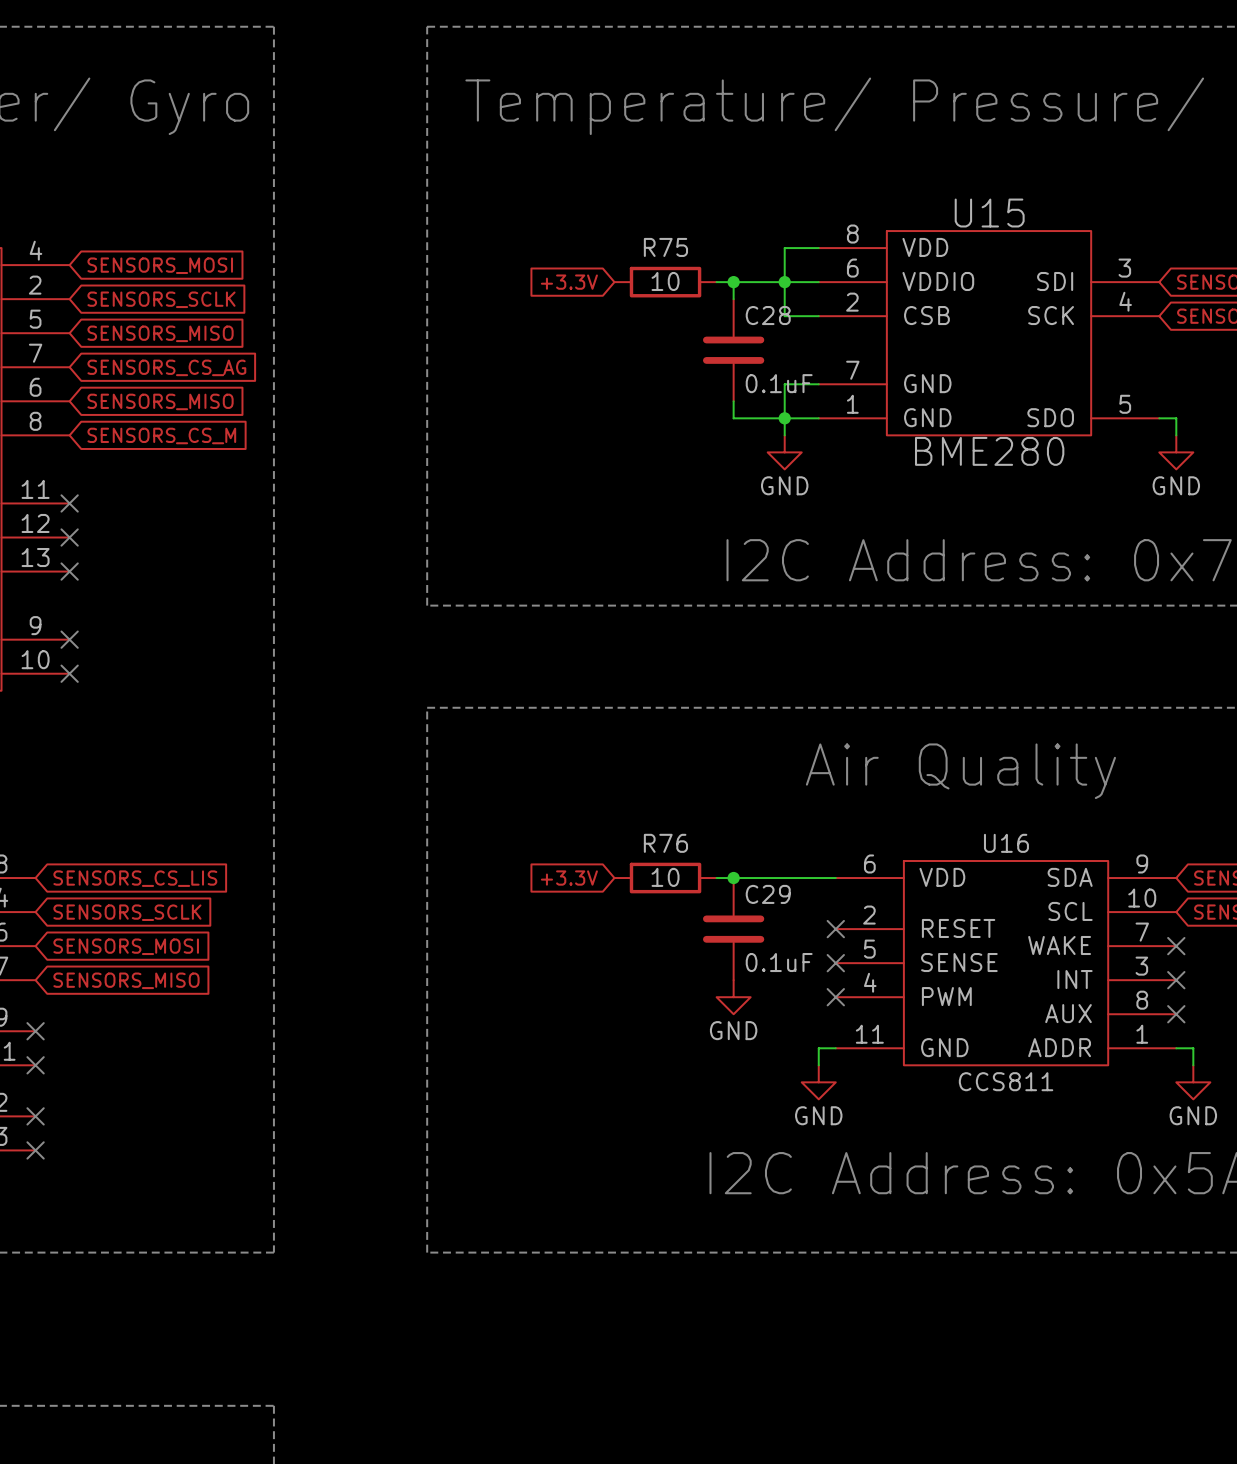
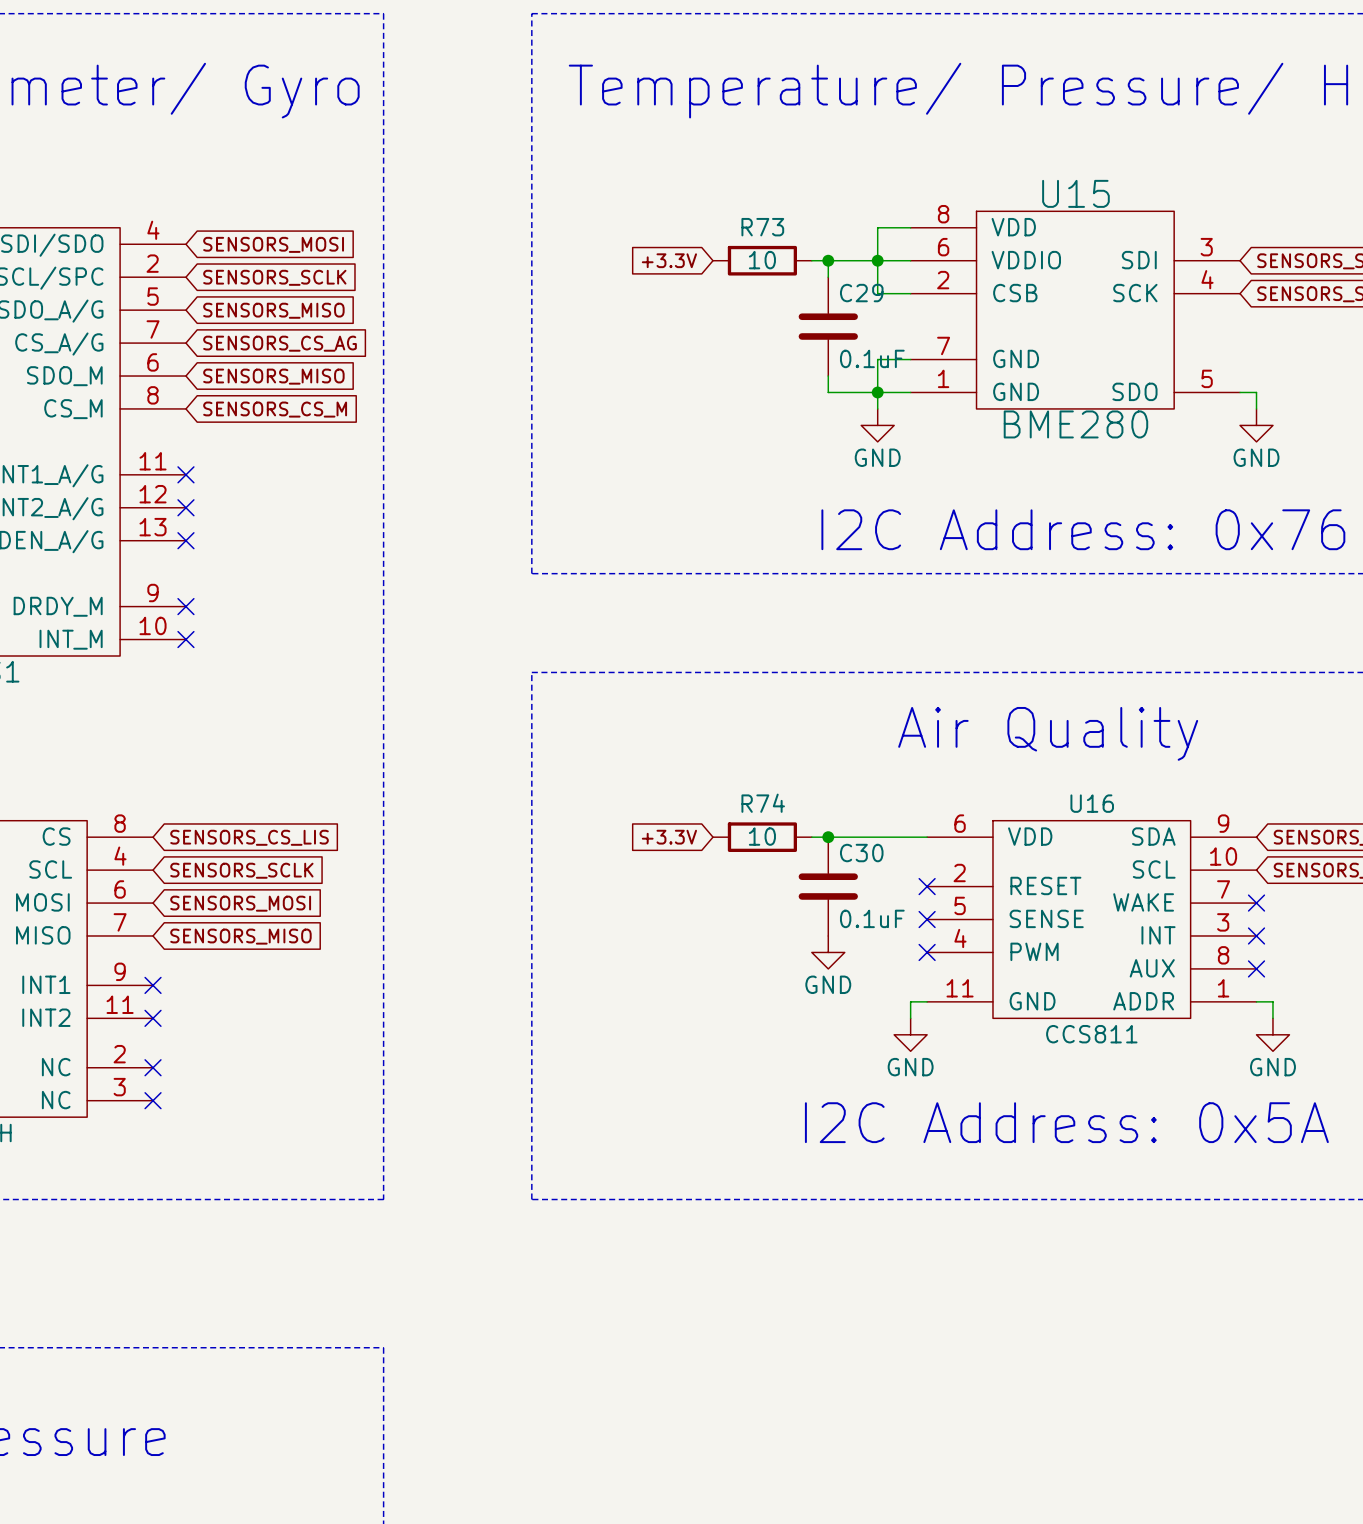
R75 name: R75 (665, 247) -> R73 (762, 227)
C28 name: C28 (768, 315) -> C29 (861, 293)
R76 name: R76 (665, 843) -> R74 (763, 803)
C29 name: C29 (768, 894) -> C30 (861, 853)

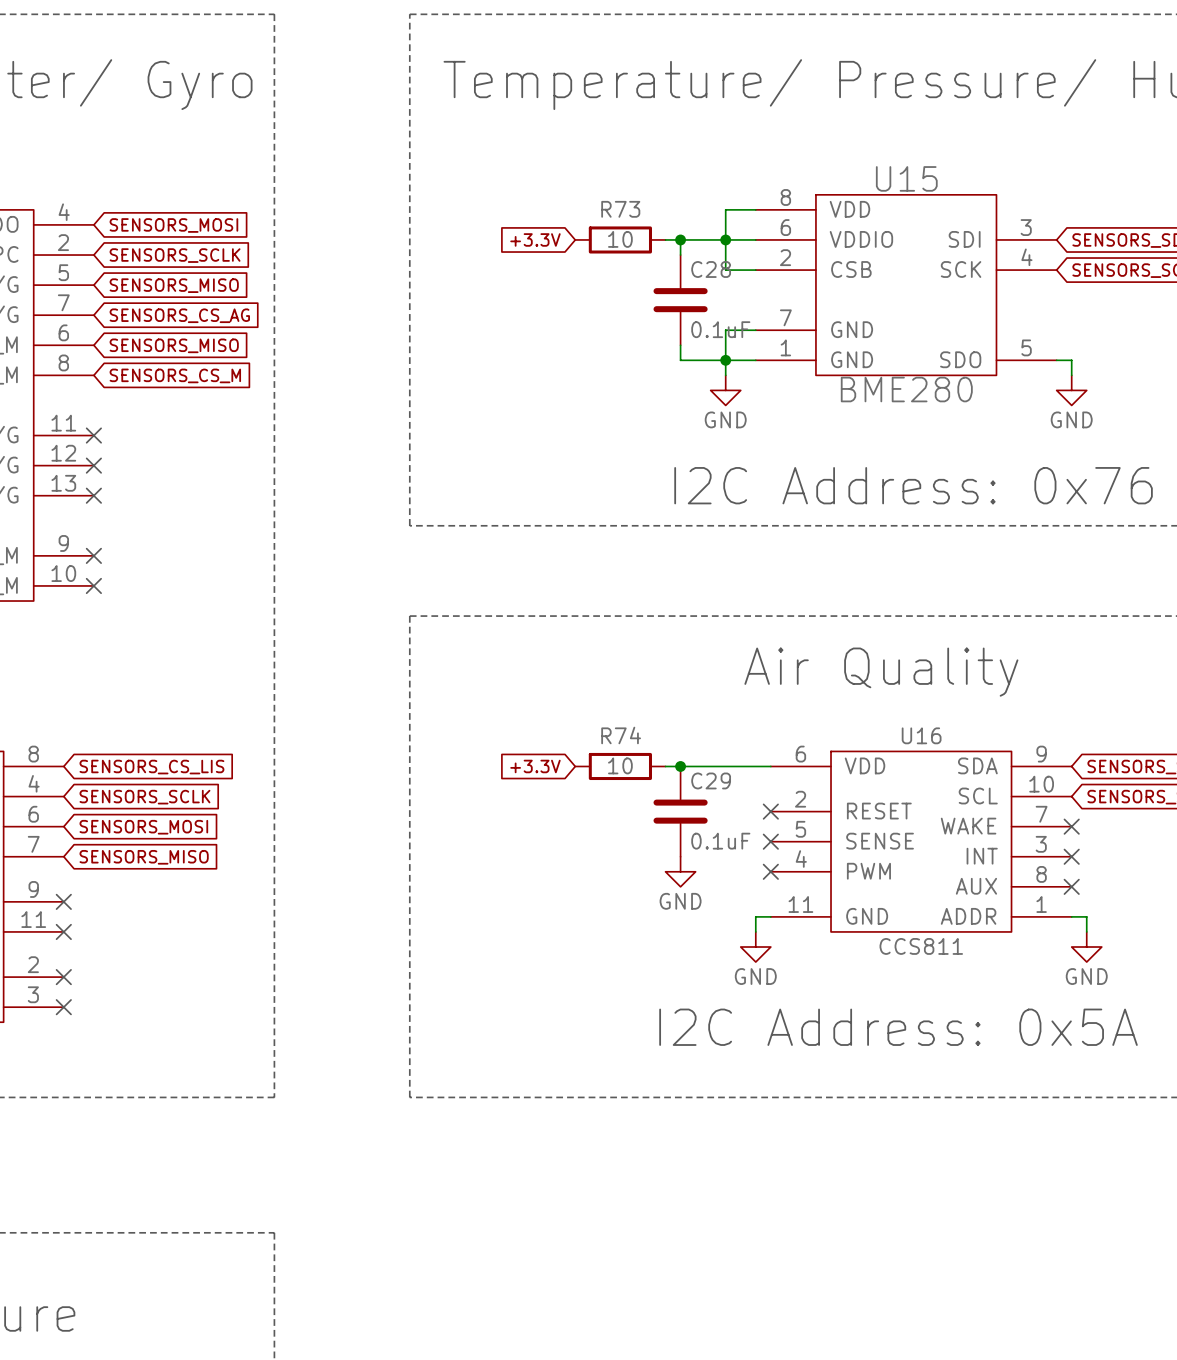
C29 name: C29 (861, 293) -> C28 (711, 269)
C30 name: C30 (861, 853) -> C29 (711, 780)

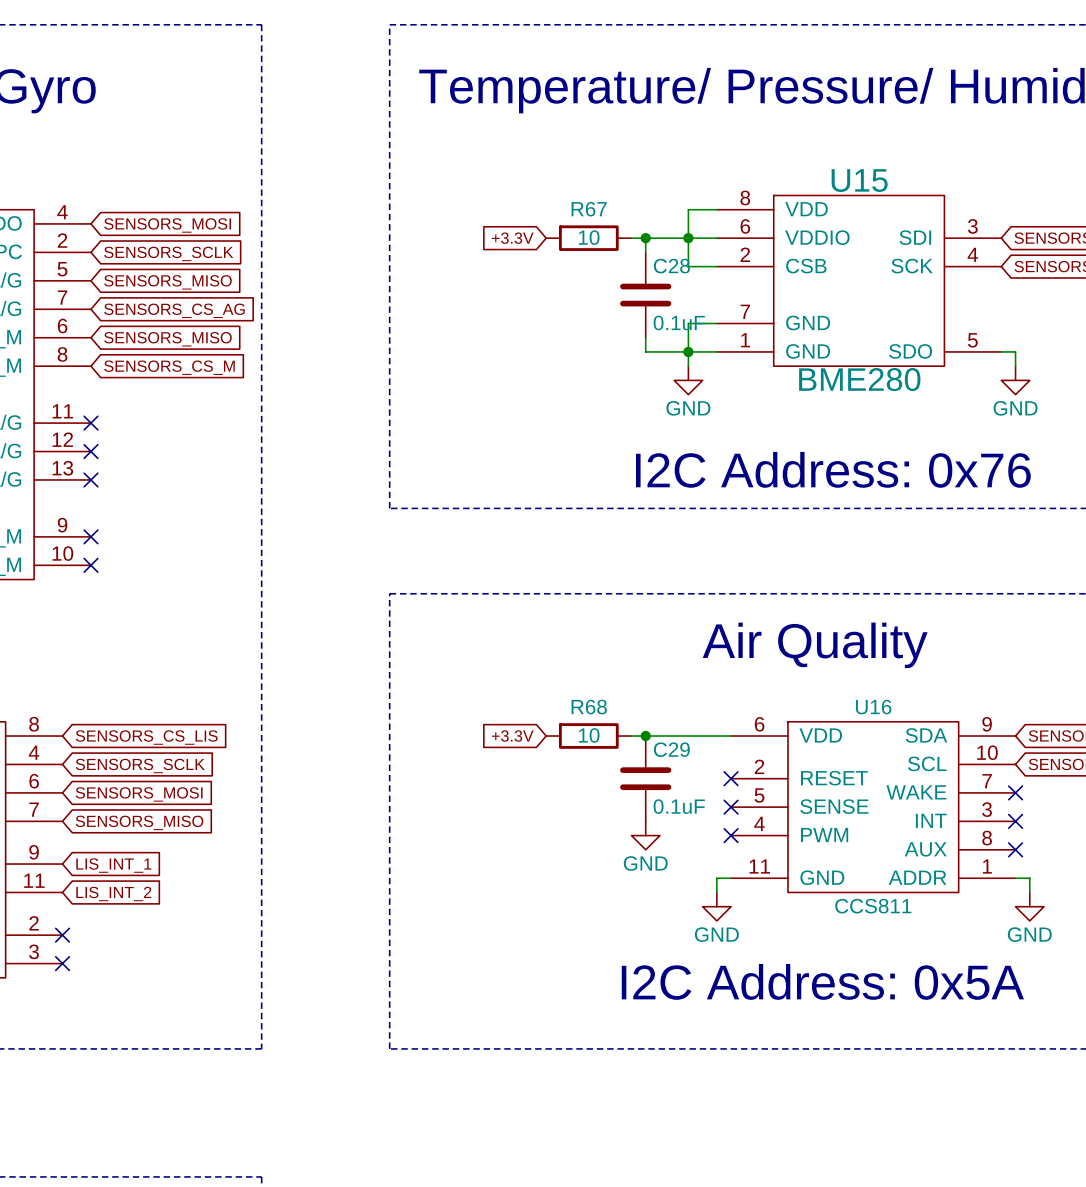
R73 name: R73 (620, 209) -> R67 (589, 209)
R74 name: R74 (621, 735) -> R68 (589, 707)
no-connect mark: (63, 901) -> none
global label: none -> LIS_INT_1 (113, 865)
no-connect mark: (63, 931) -> none
global label: none -> LIS_INT_2 (113, 894)

